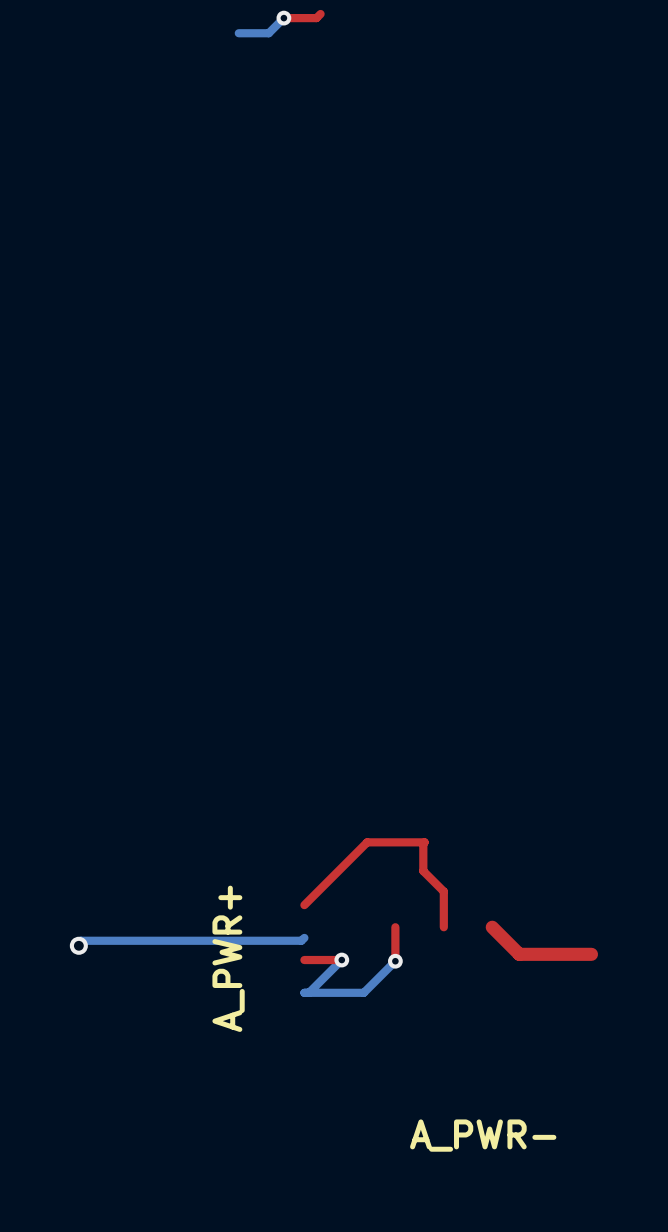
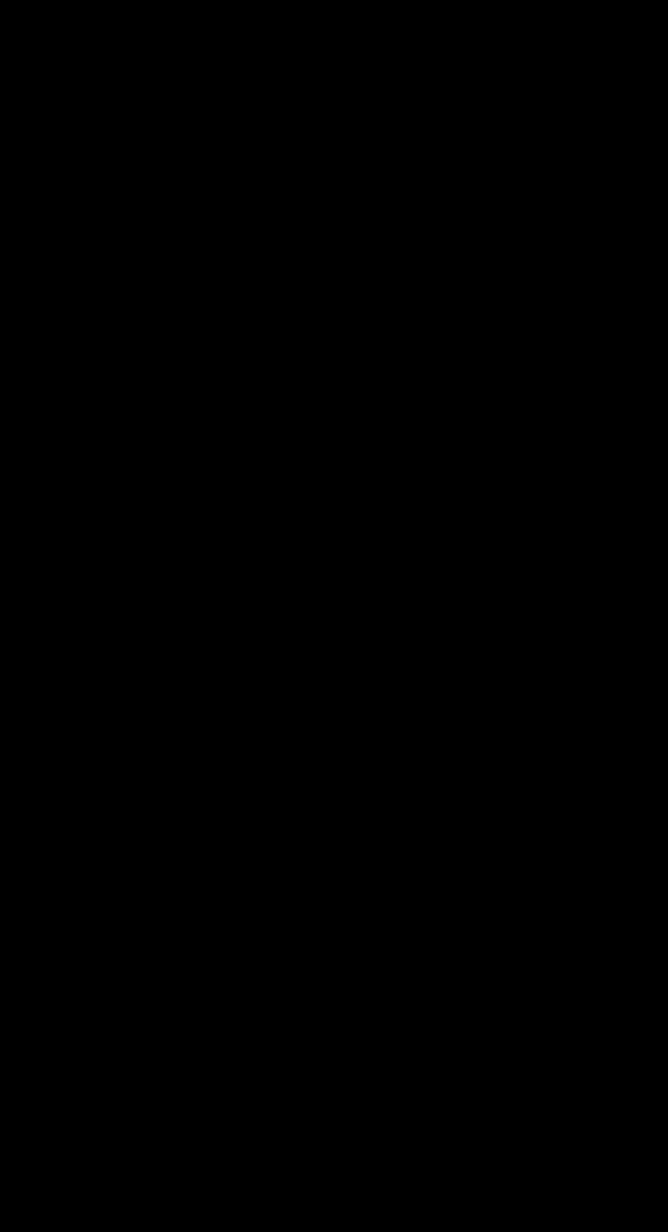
top track: (320, 14) (316, 18) (283, 18) -> none
bottom track: (283, 18) (268, 33) (238, 33) -> none
via: (283, 18) -> none
top track: (304, 905) (367, 842) (424, 842) (423, 871) (443, 891) (443, 927) -> none
top track: (395, 927) (395, 961) -> none
top track: (492, 927) (519, 954) (591, 954) -> none
bottom track: (304, 937) (301, 940) (80, 940) (78, 945) -> none
via: (78, 945) -> none
text: A_PWR+ (228, 958) -> none
top track: (304, 960) (341, 960) -> none
bottom track: (341, 960) (308, 992) -> none
via: (341, 960) -> none
bottom track: (395, 961) (363, 992) (304, 992) -> none
via: (395, 961) -> none
text: A_PWR- (483, 1135) -> none

